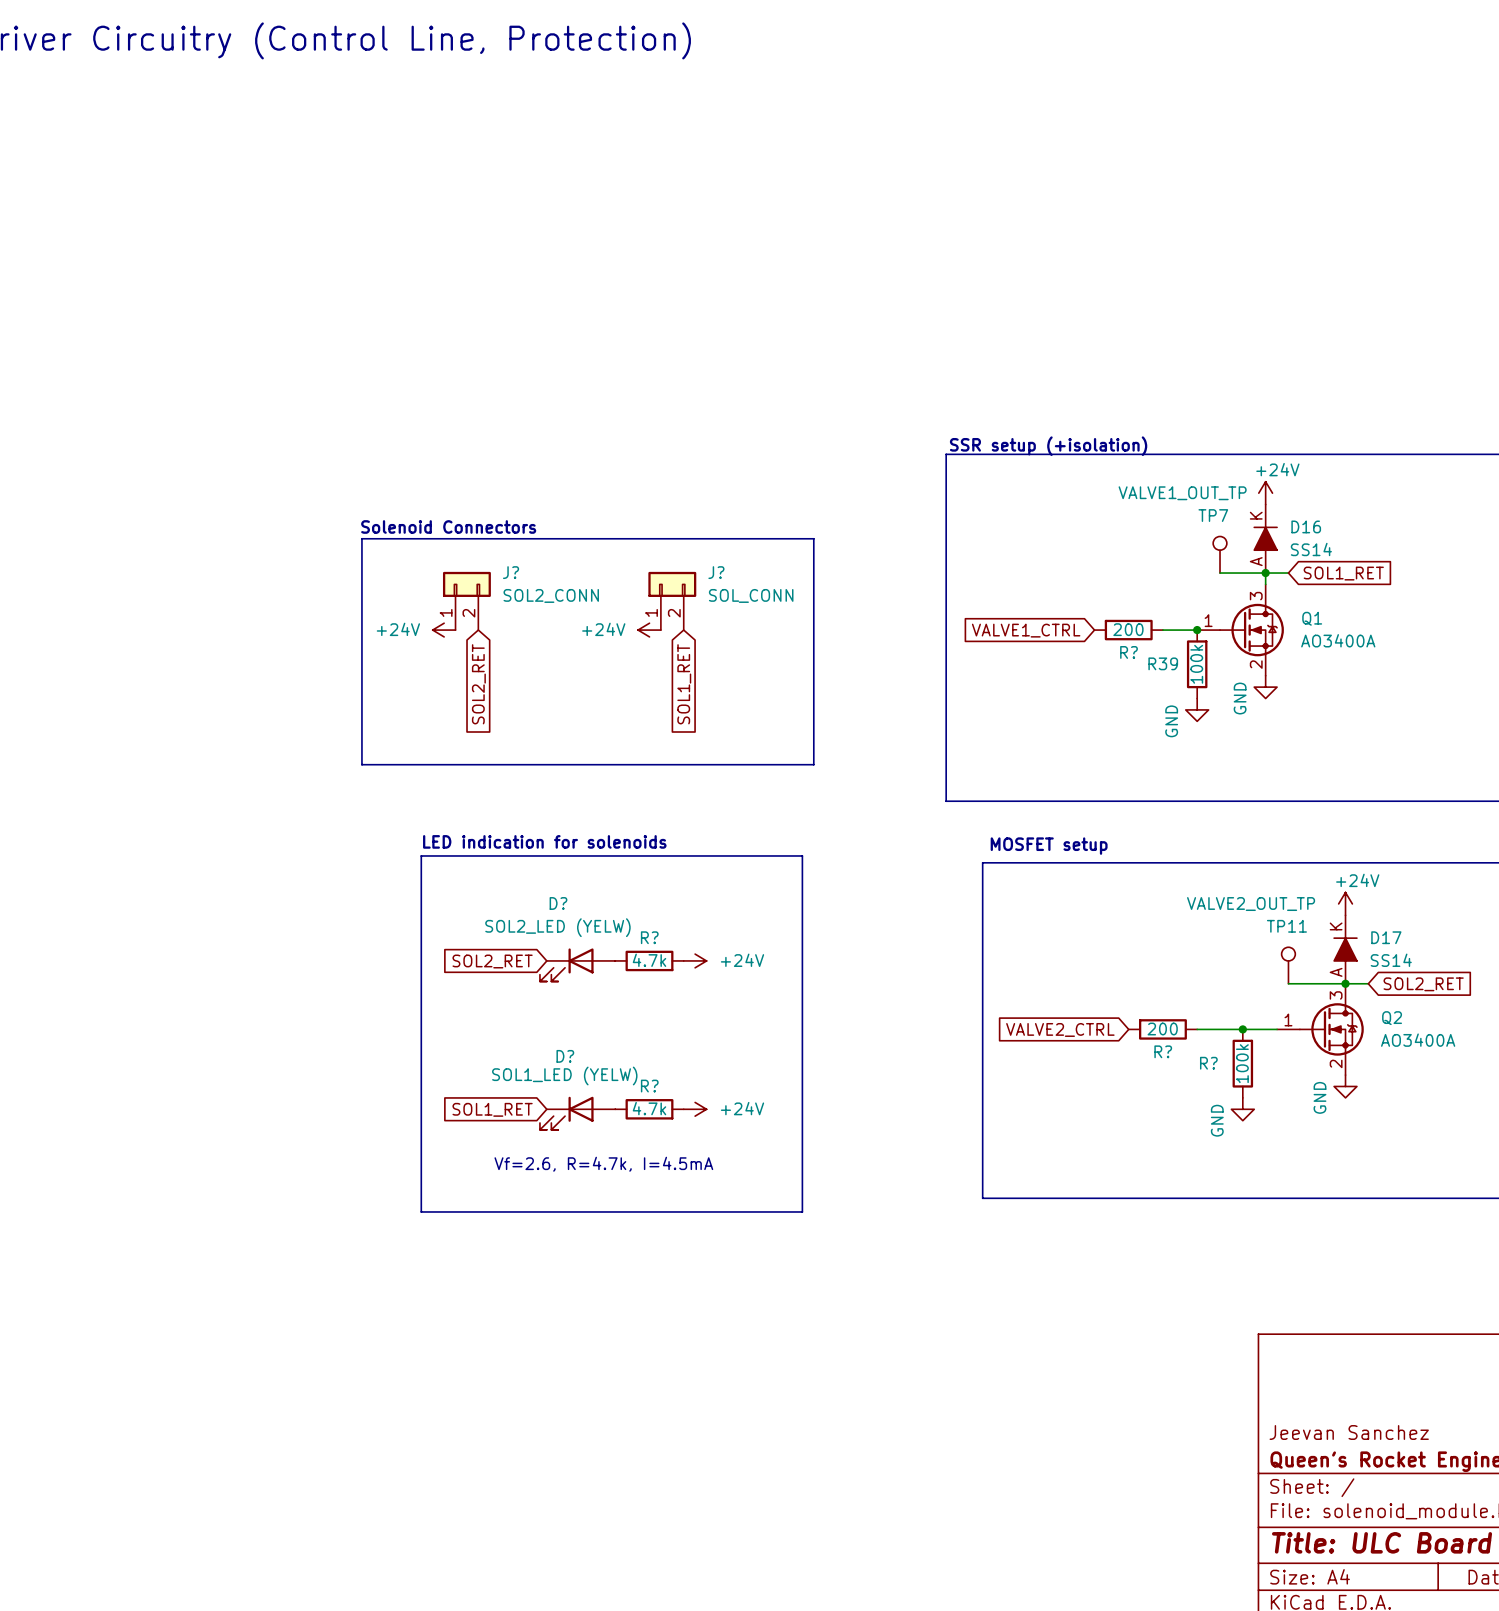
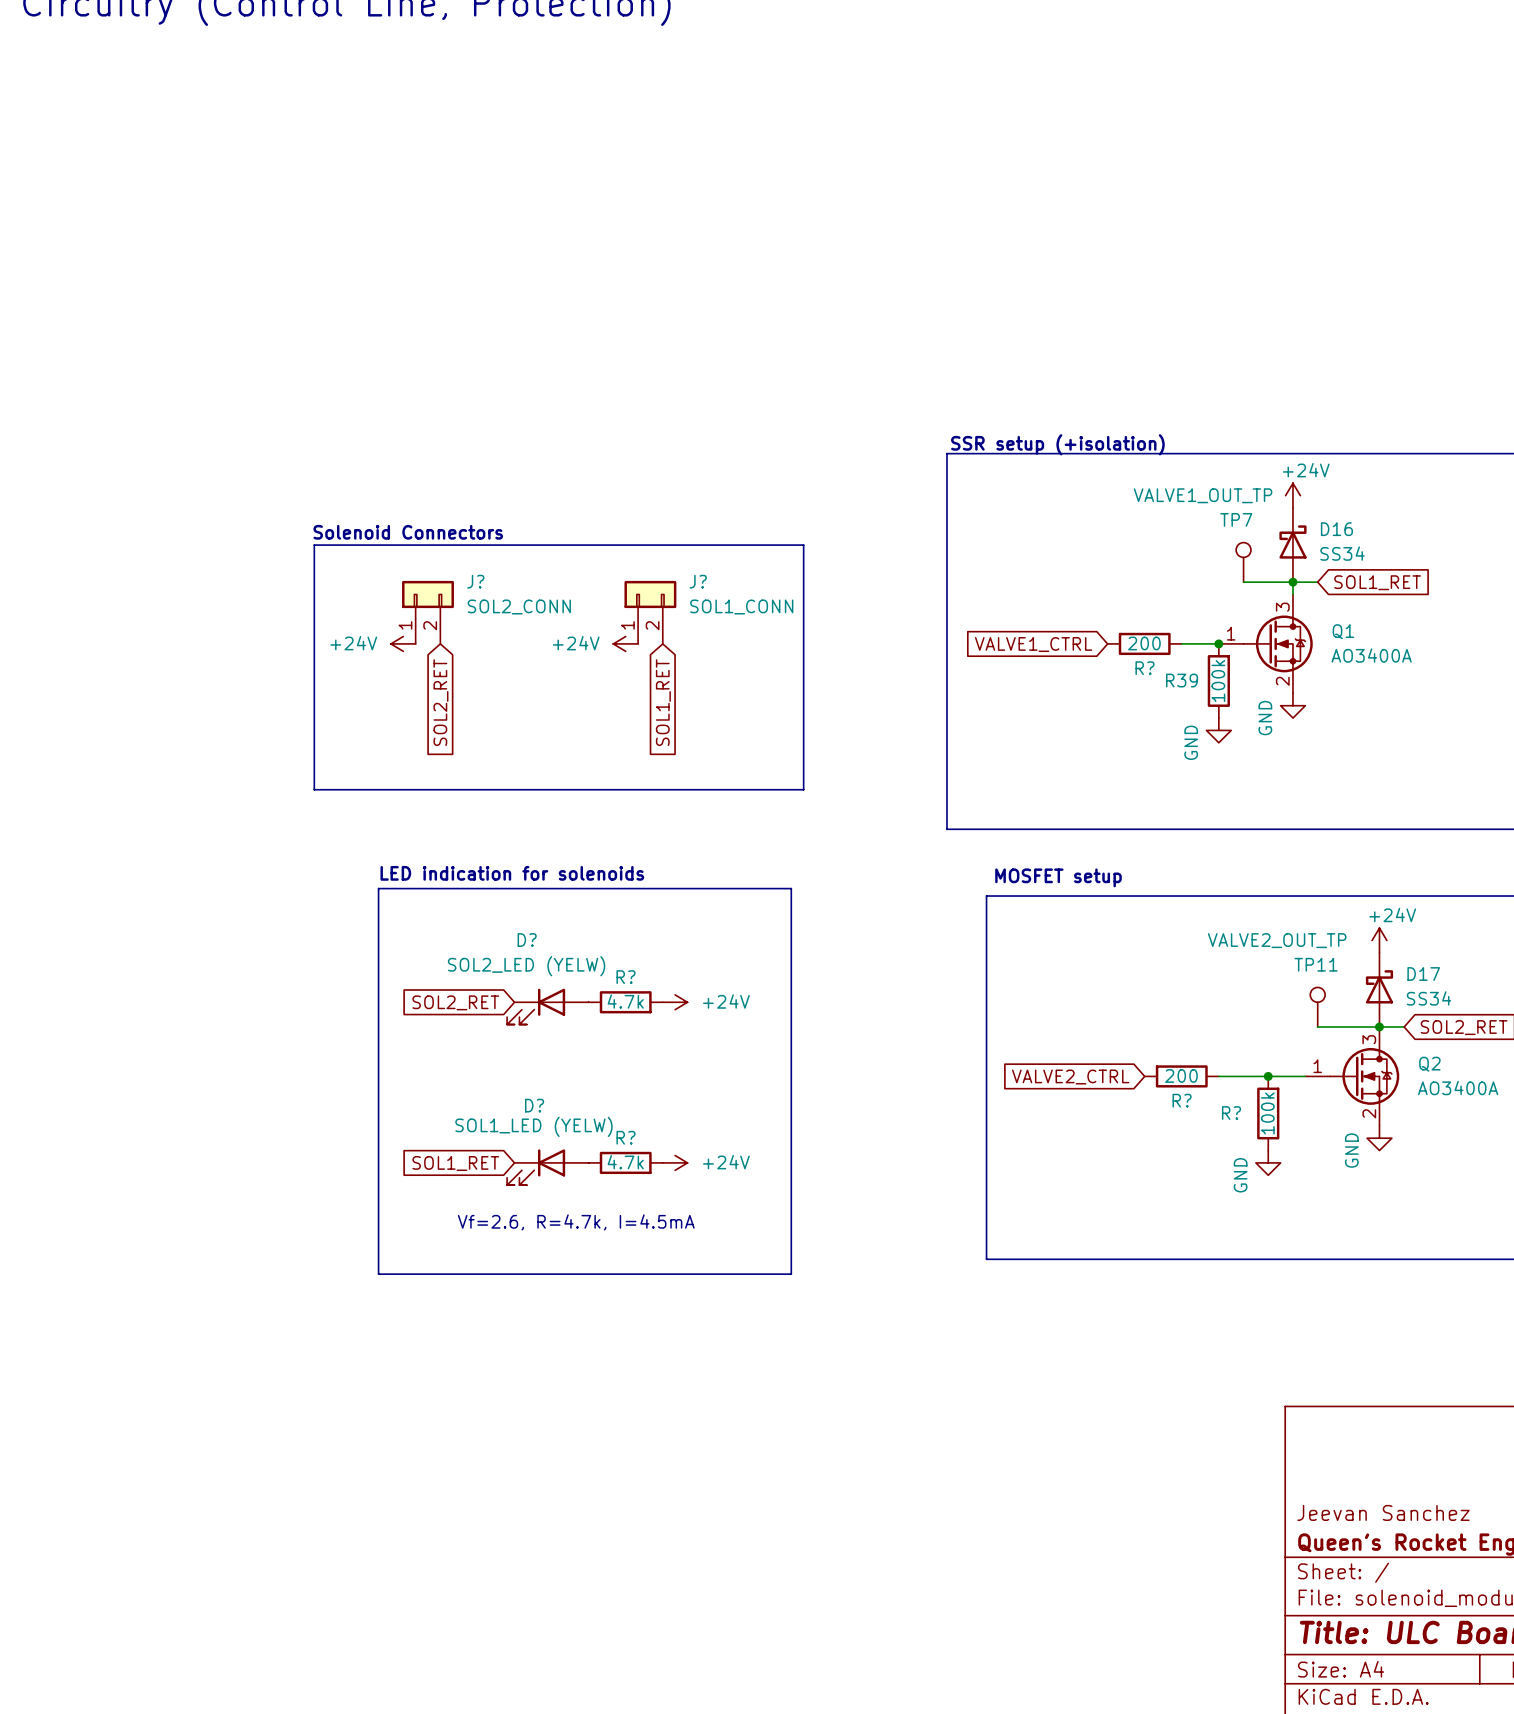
D16 symbol: [1254, 504, 1278, 574] -> [1279, 508, 1307, 583]
D16 value: SS14 (1311, 549) -> SS34 (1342, 553)
J? value: SOL_CONN (751, 595) -> SOL1_CONN (741, 606)
D17 symbol: [1334, 915, 1357, 984] -> [1365, 952, 1394, 1027]
D17 value: SS14 (1391, 960) -> SS34 (1429, 998)

